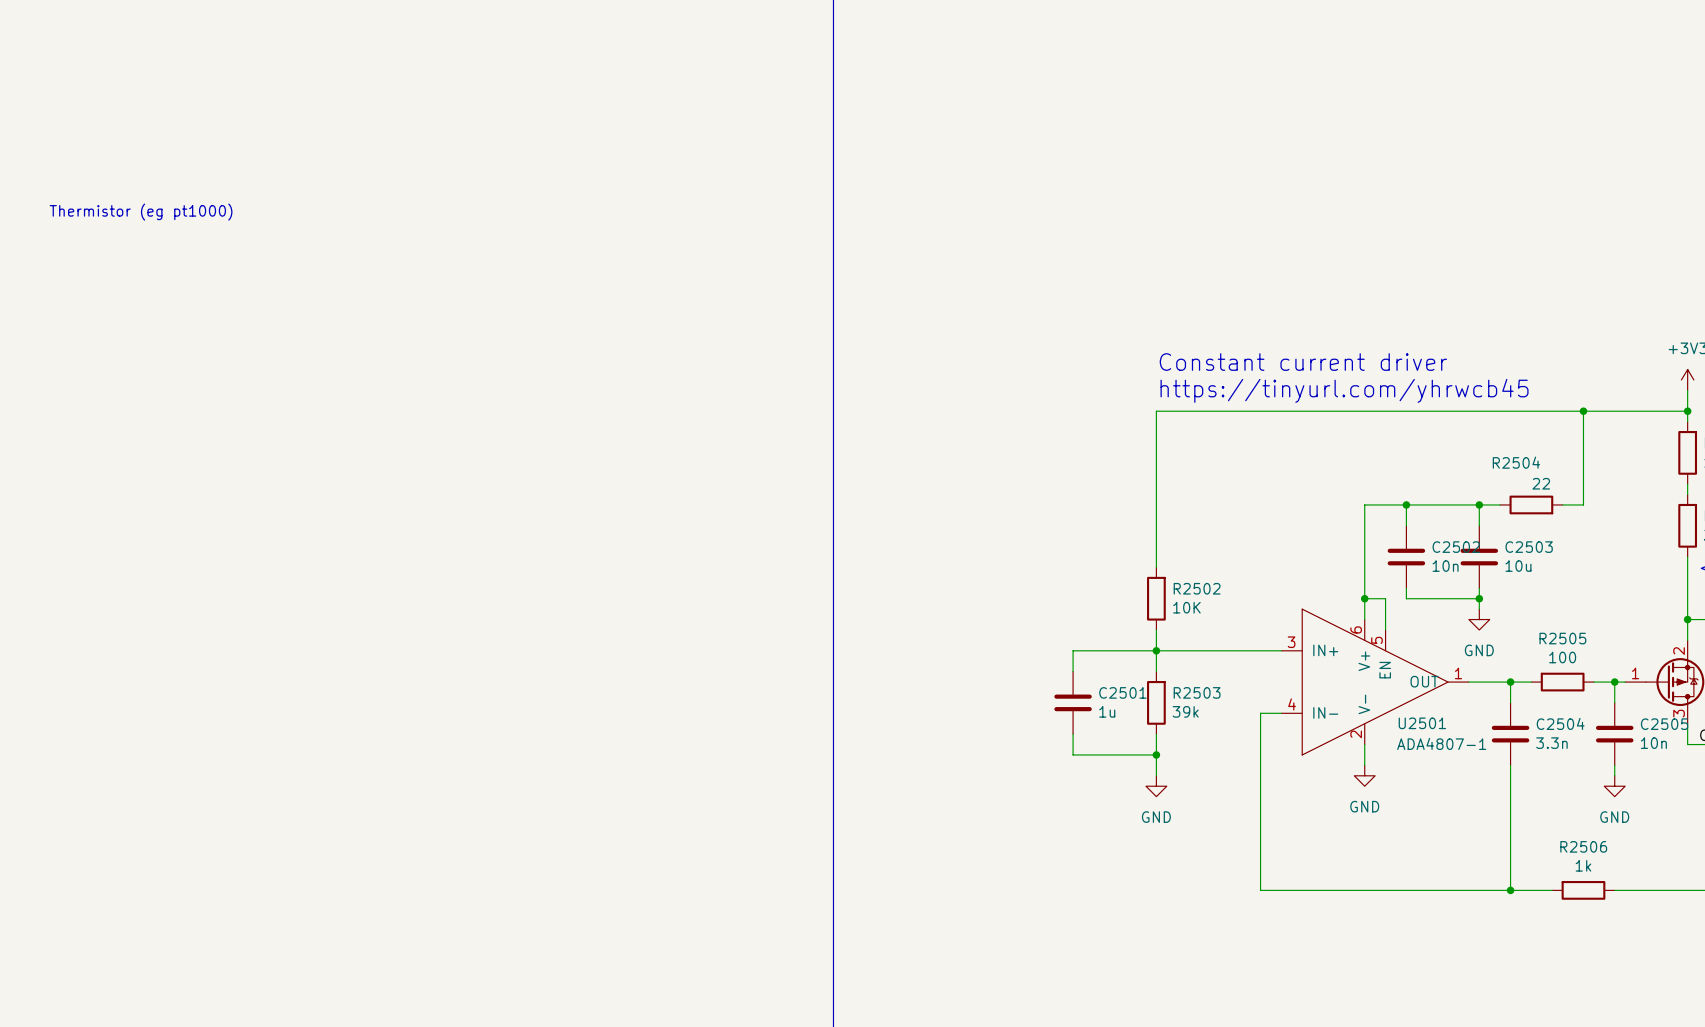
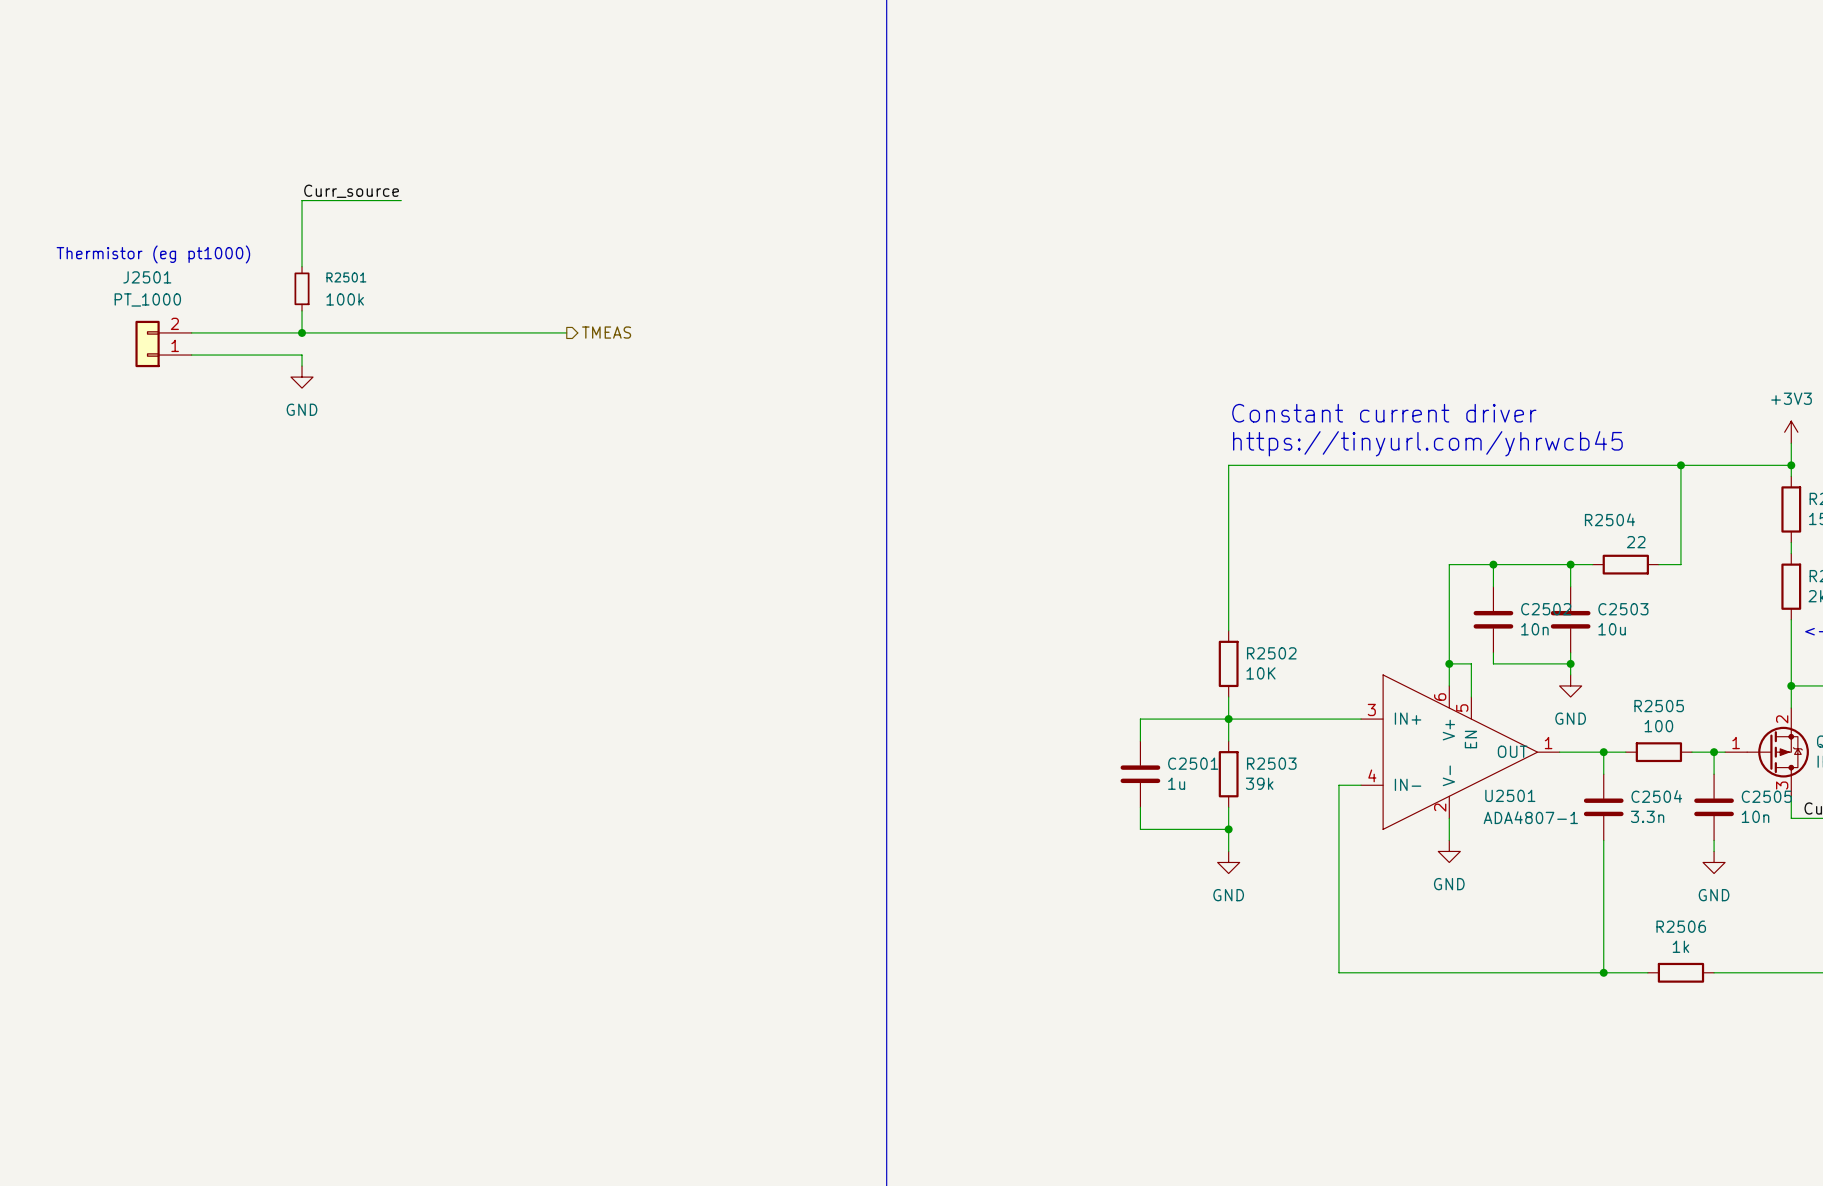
label: none -> Curr_source (351, 191)
wire: none -> (401, 200) (302, 200) (302, 266)
R2501: none -> 100k (302, 288)
wire: none -> (302, 310) (302, 332)
hierarchical label: none -> TMEAS (606, 332)
wire: none -> (191, 332) (566, 332)
junction: none -> (302, 332)
J2501: none -> PT_1000 (163, 343)
wire: none -> (191, 355) (302, 355) (302, 366)
power symbol: none -> GND (302, 377)

